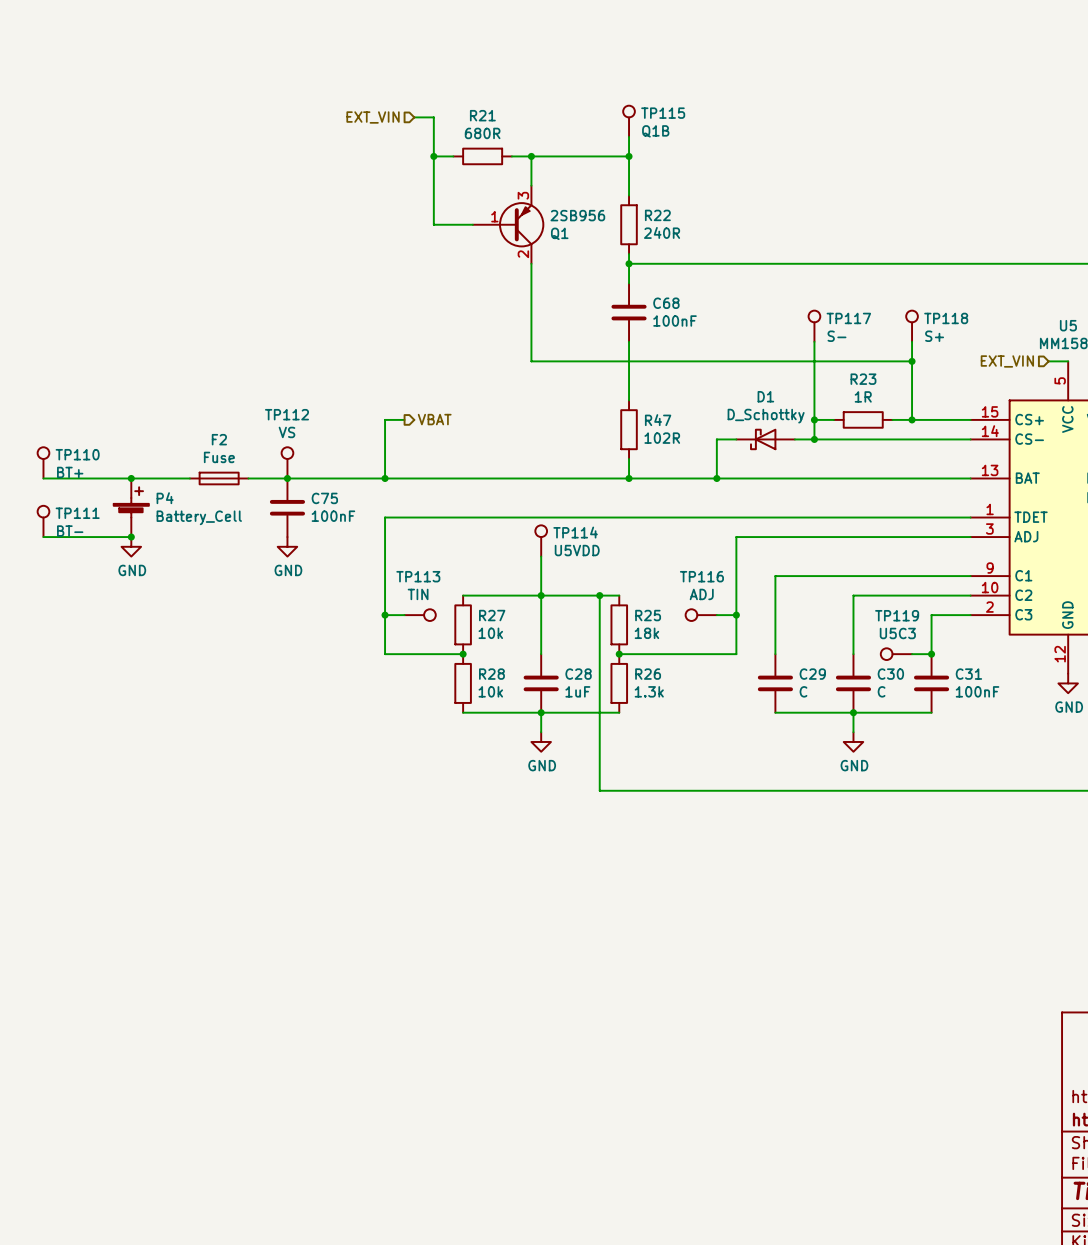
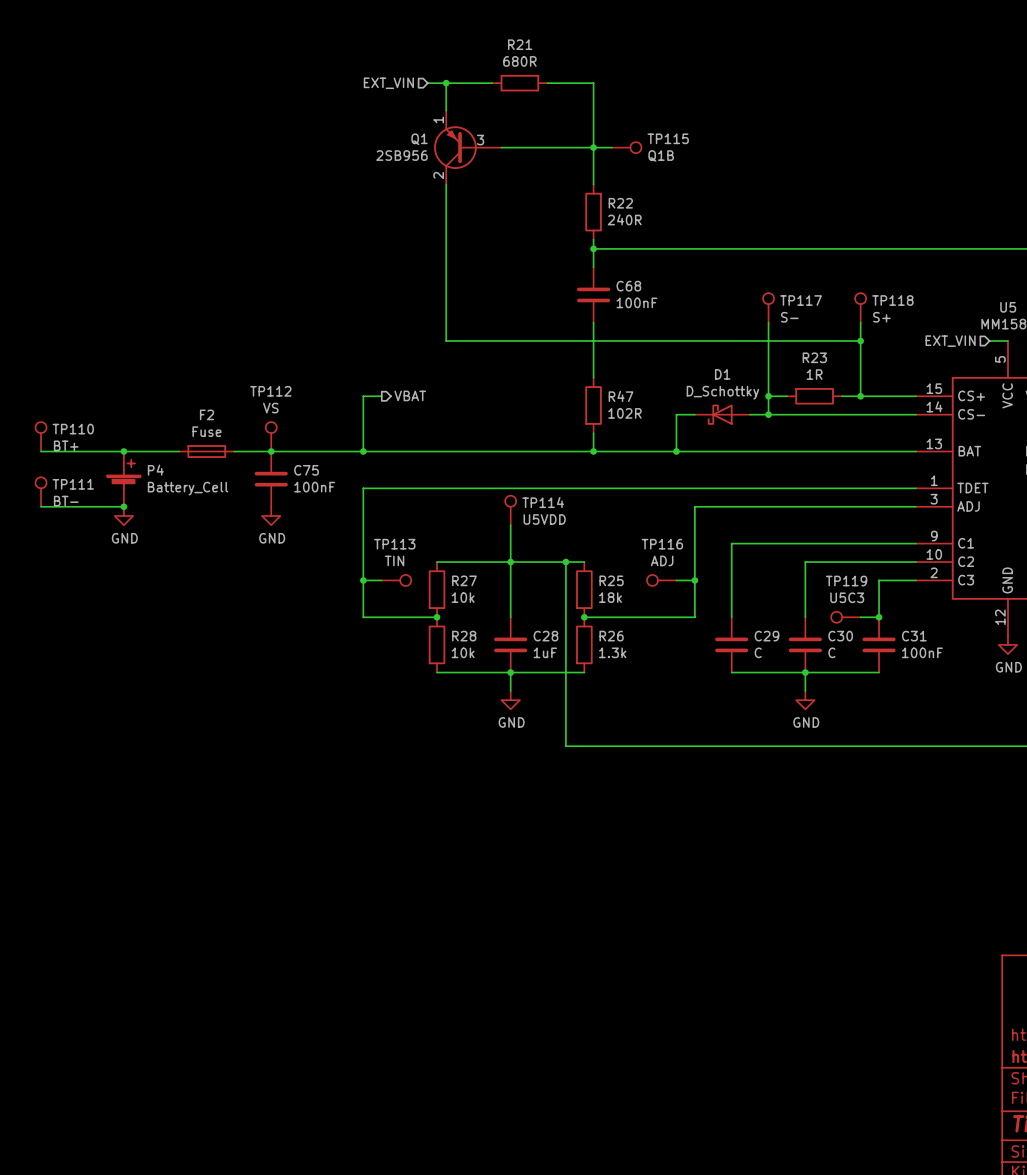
wire: none -> (427, 83) (492, 83)
wire: none -> (446, 83) (446, 110)
junction: none -> (446, 83)
wire: none -> (547, 83) (593, 83) (593, 129)
TP115 rotation: 0° (629, 111) -> 90° clockwise (635, 147)
hierarchical label position: EXT_VIN (373, 117) -> EXT_VIN (388, 83)
wire: (414, 117) (433, 117) (433, 224) (472, 224) -> none
TP115 position: (629, 121) -> (626, 147)
wire: (433, 156) (453, 156) -> none
junction: (433, 156) -> none
R21 position: (482, 156) -> (519, 83)
wire: (511, 156) (531, 156) (531, 185) -> none
junction: (531, 156) -> none
wire: none -> (593, 147) (611, 147)
Q1 symbol: [472, 185, 545, 264] -> [434, 110, 502, 185]
Q1 value position: 2SB956 (577, 215) -> 2SB956 (401, 155)
Q1 name position: Q1 (559, 233) -> Q1 (419, 139)
wire: (531, 263) (531, 361) -> (446, 184) (446, 341) (501, 341)

